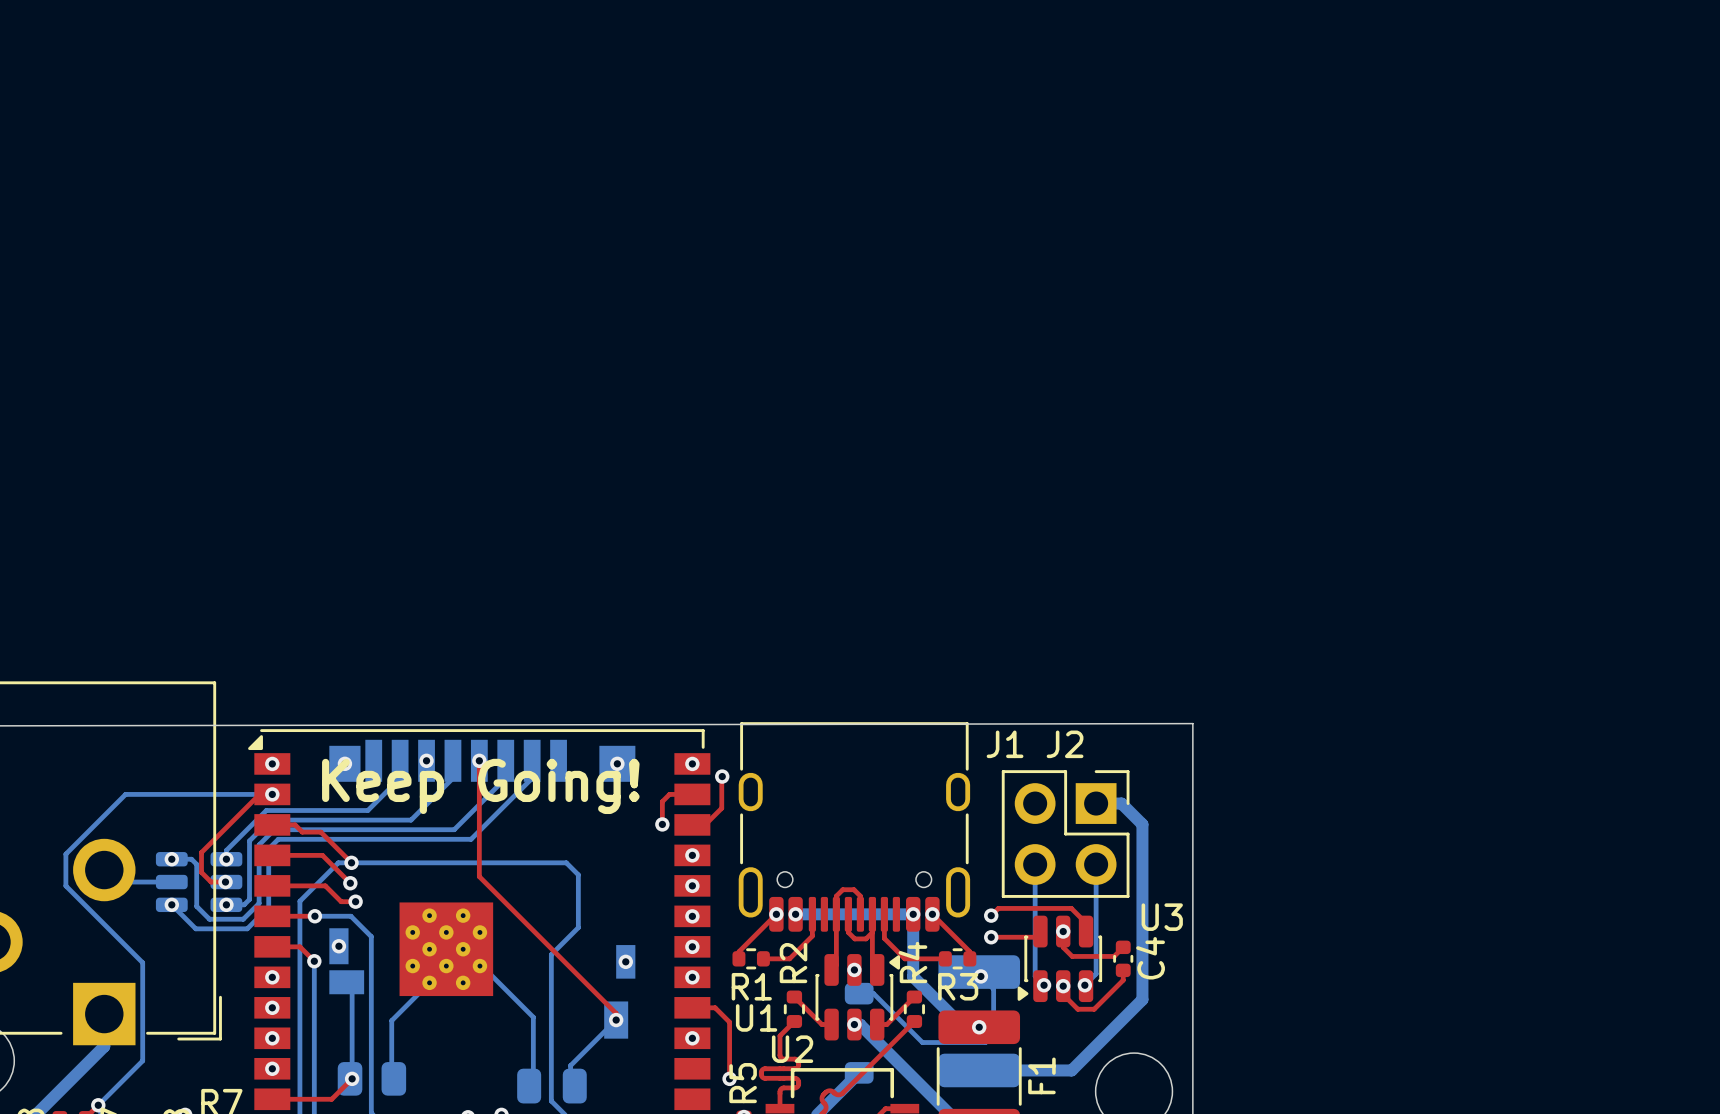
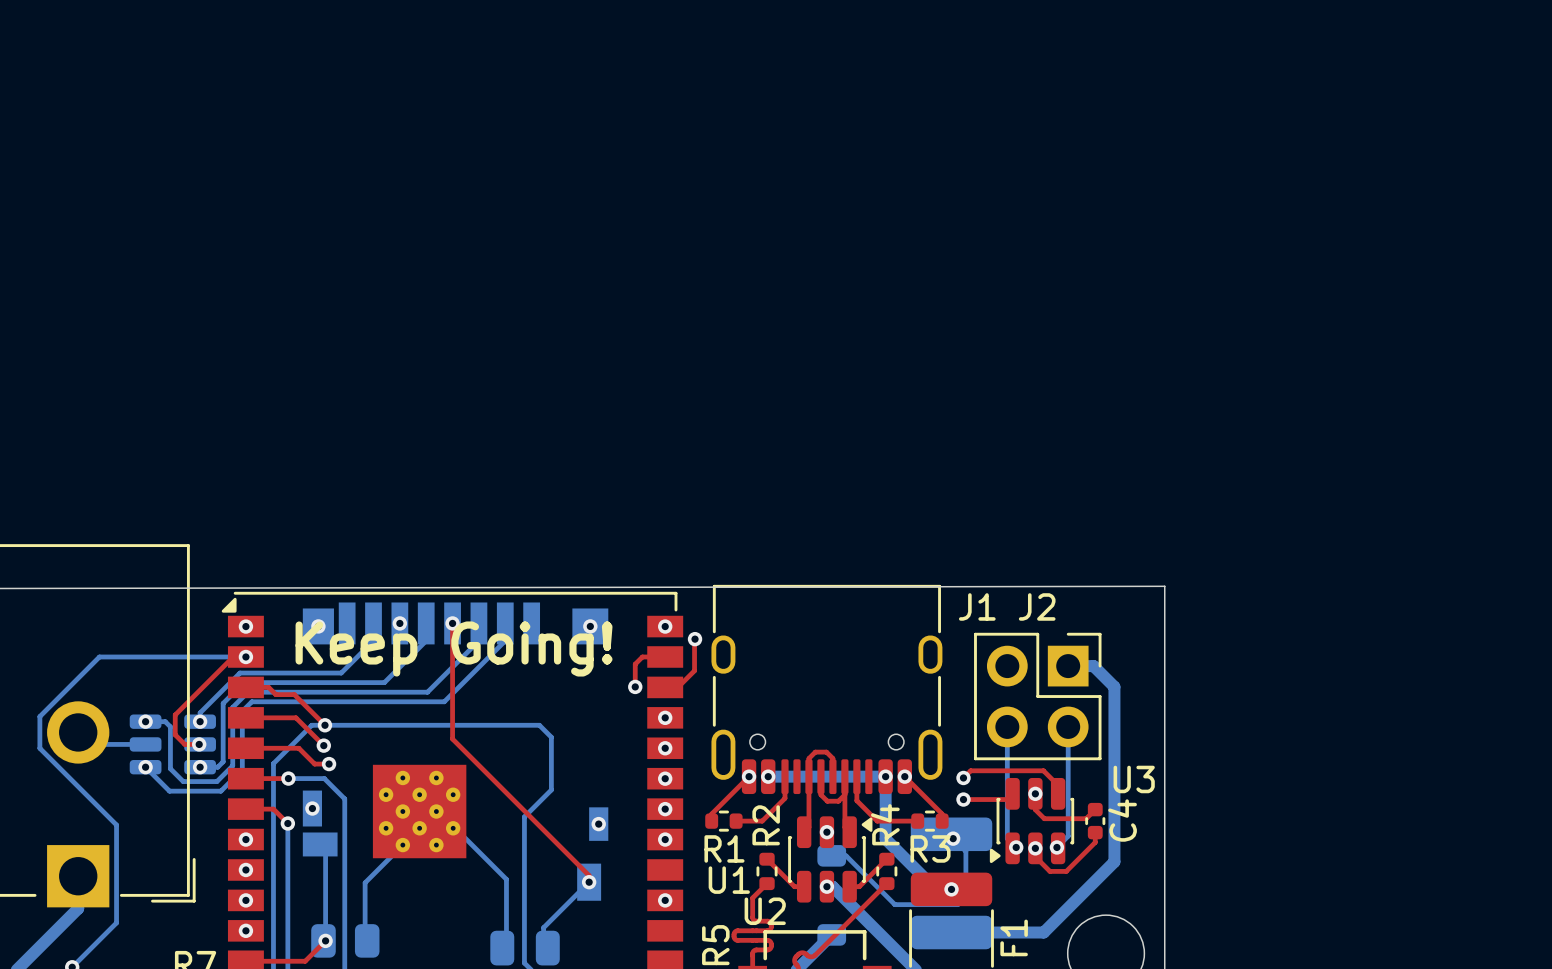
top track: (692, 1007) (715, 1007) (729, 1022) (729, 1078) -> none
via: (729, 1078) -> none

